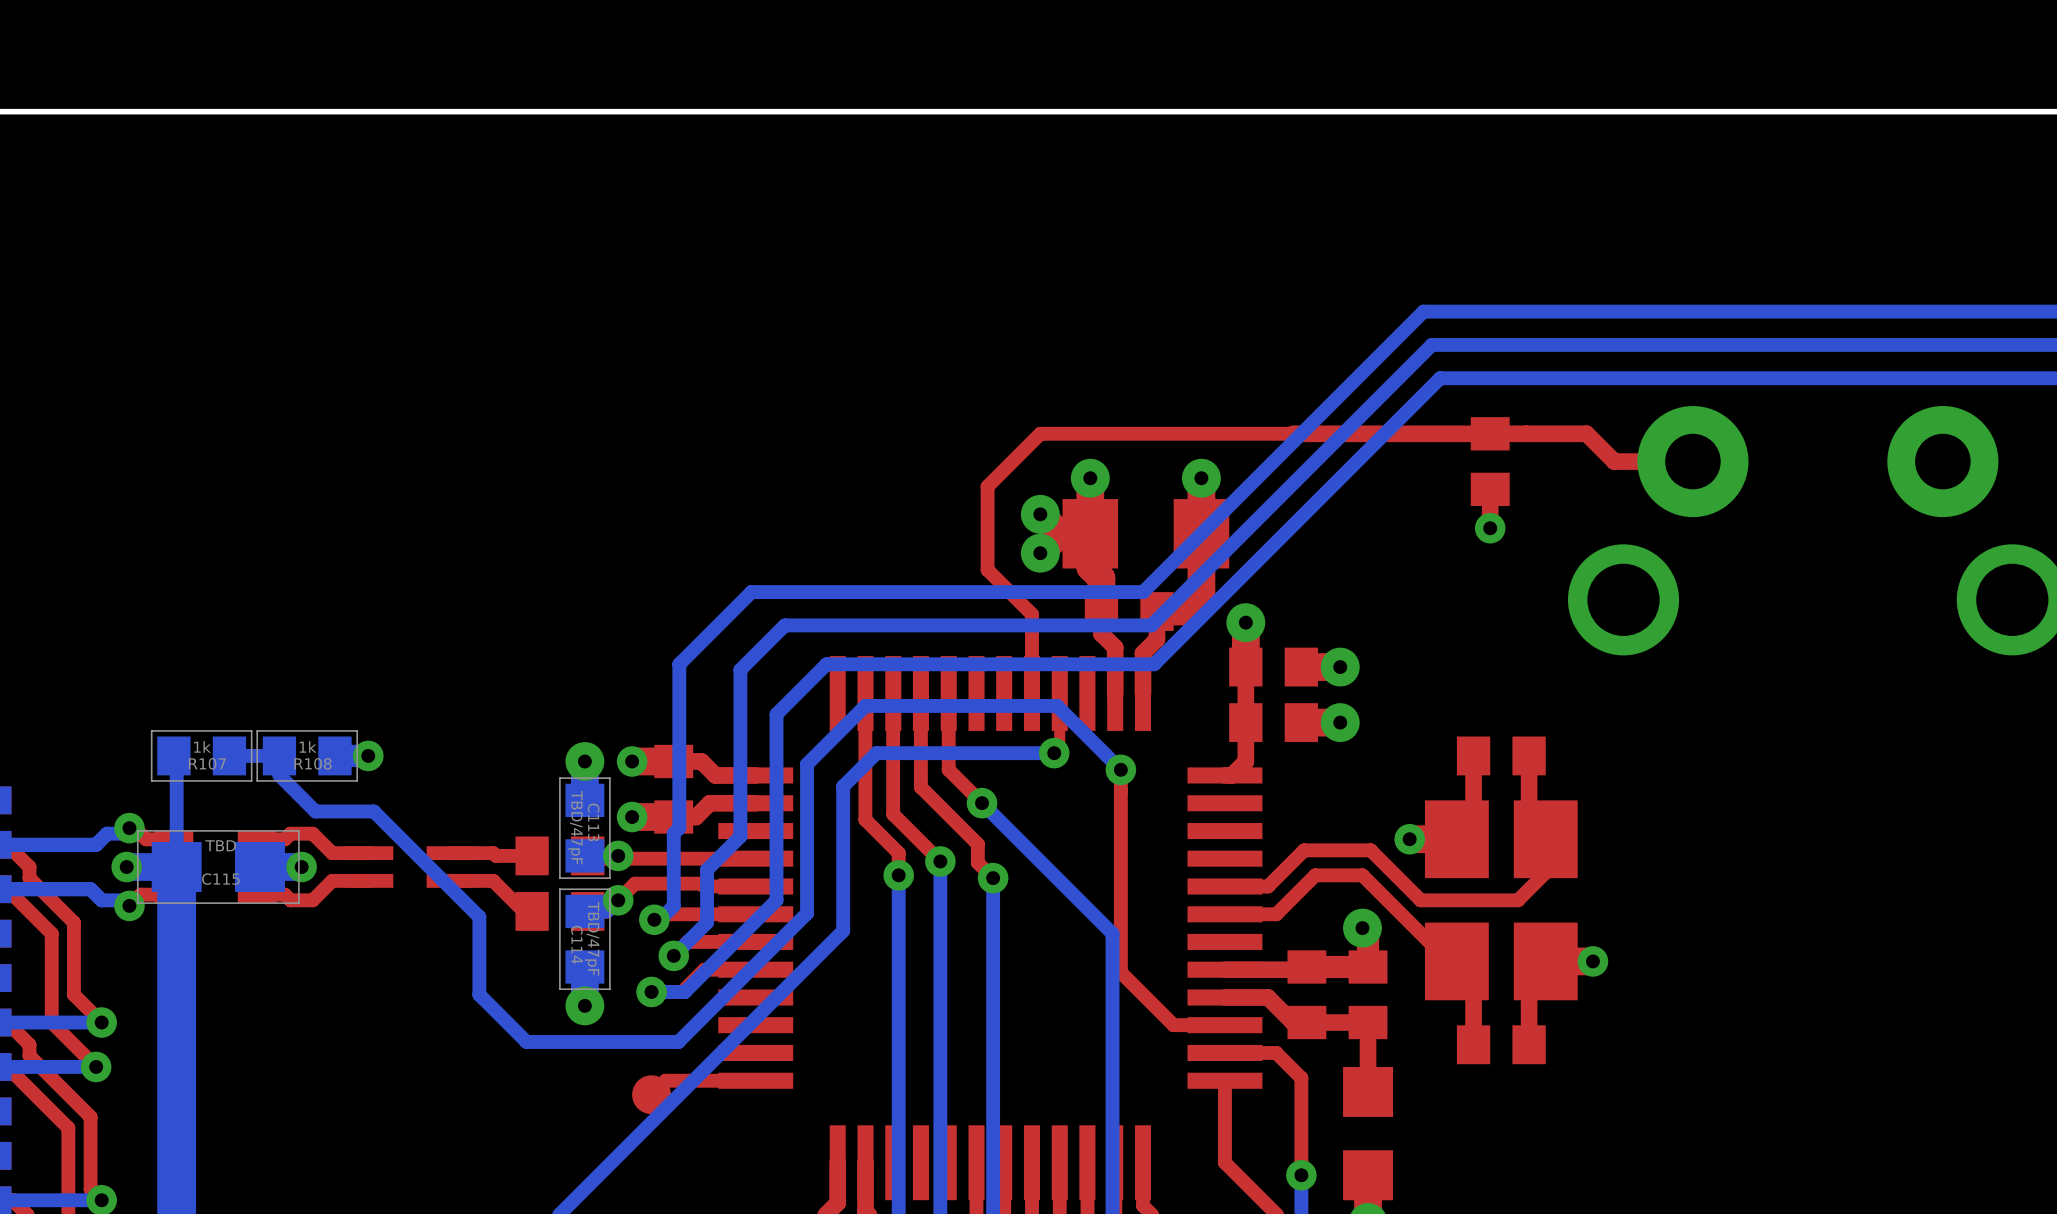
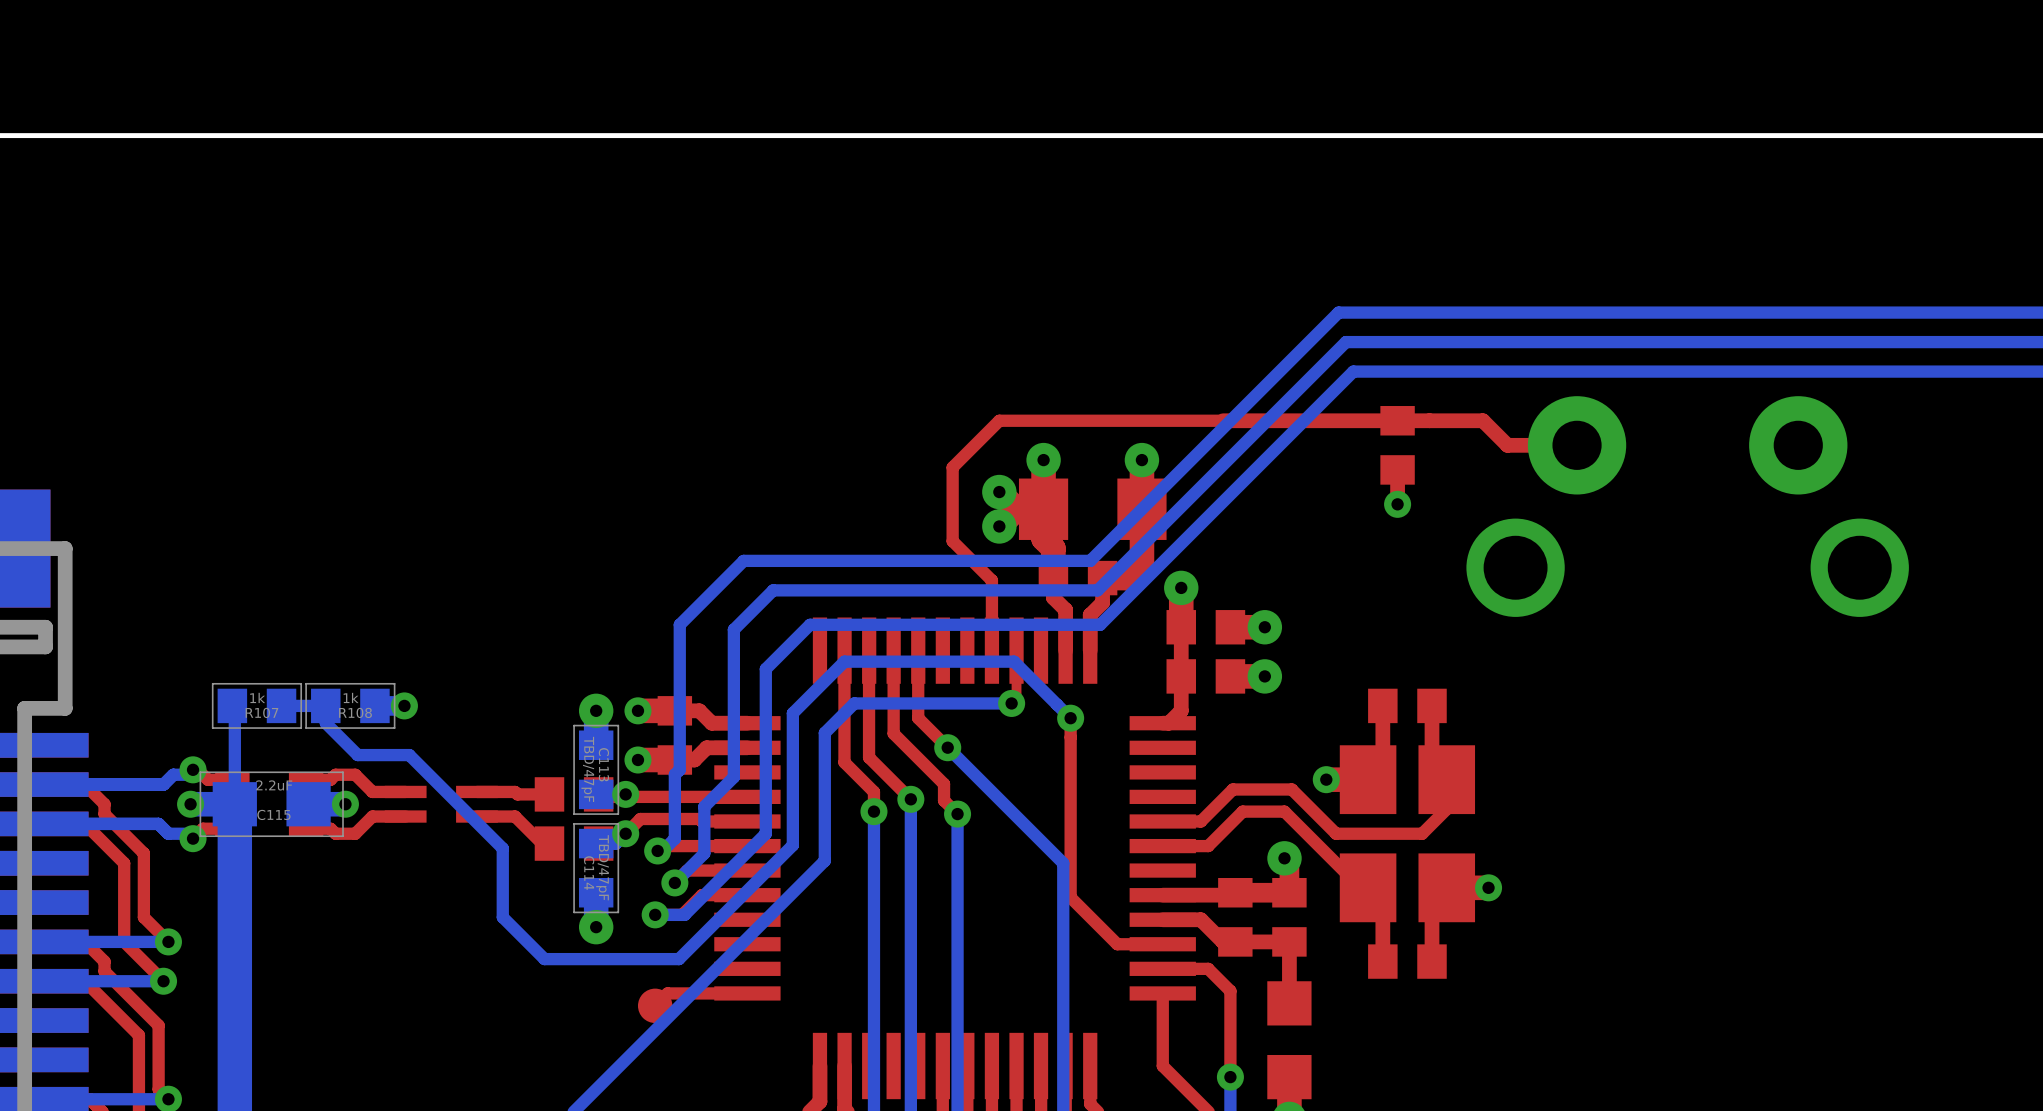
C115 value: TBD (220, 845) -> 2.2uF (274, 785)

